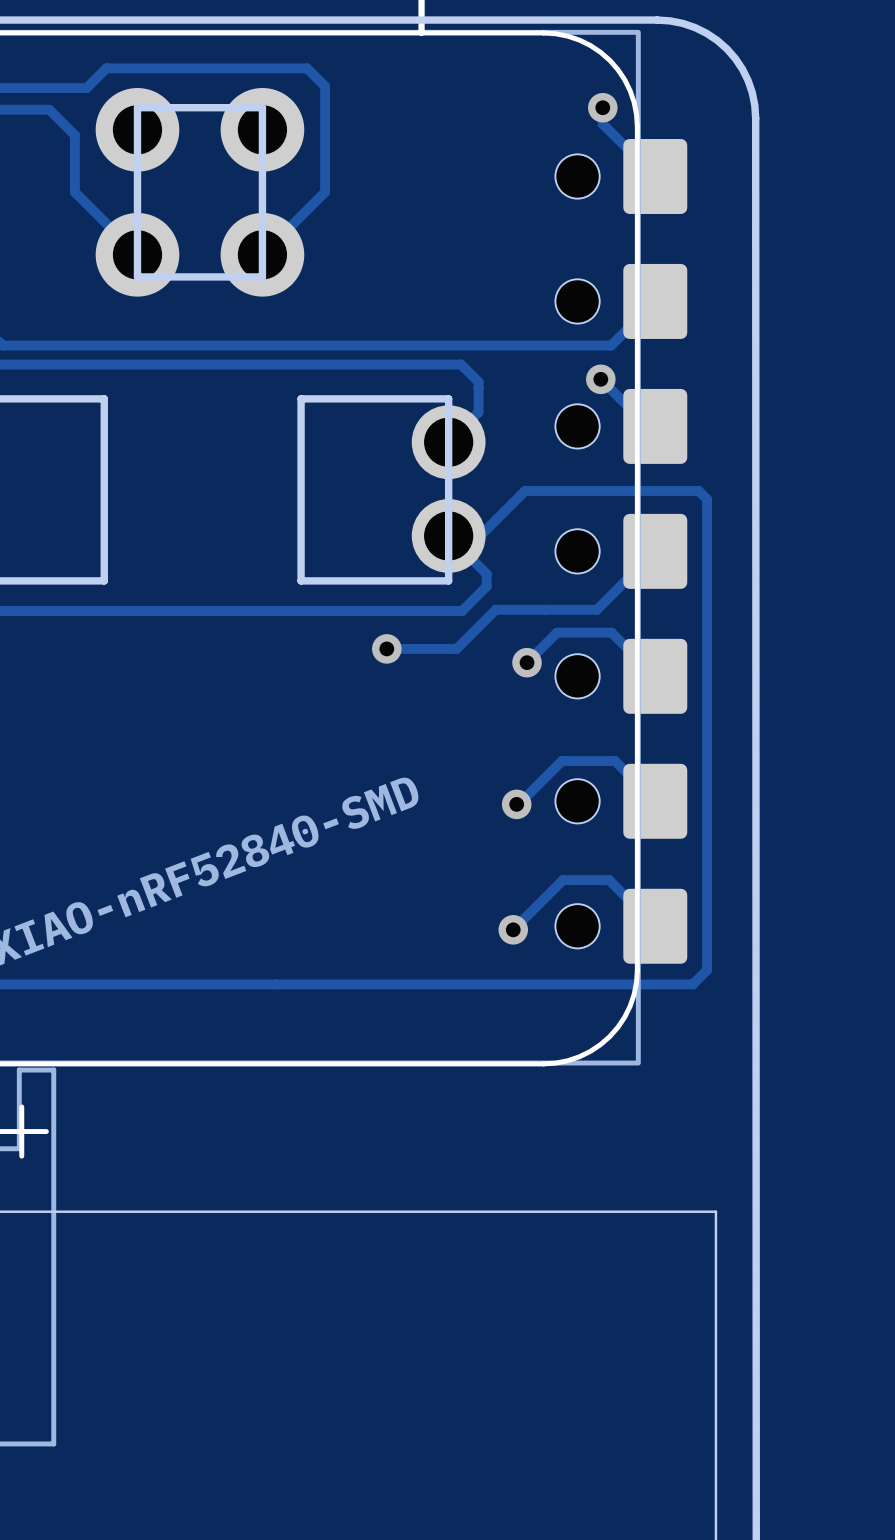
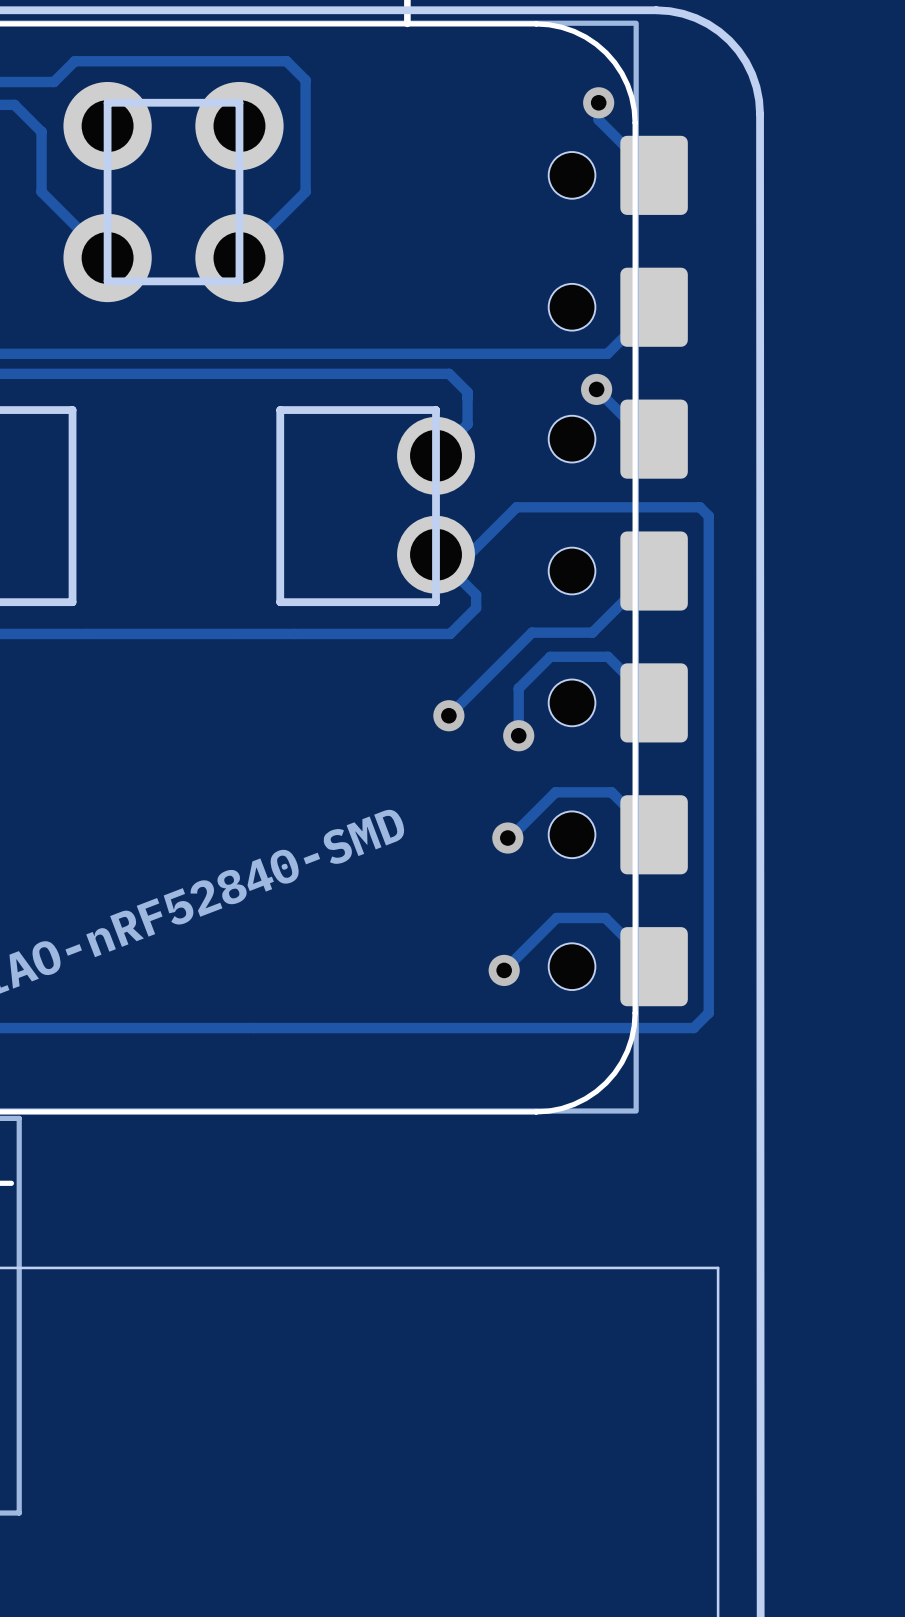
track: (545, 609) (495, 609) (456, 648) (386, 648) -> (538, 632) (531, 632) (448, 715)
via: (386, 648) -> none
track: none -> (518, 688) (518, 735)
via: (527, 662) -> none
via: none -> (448, 715)
via: none -> (518, 735)

